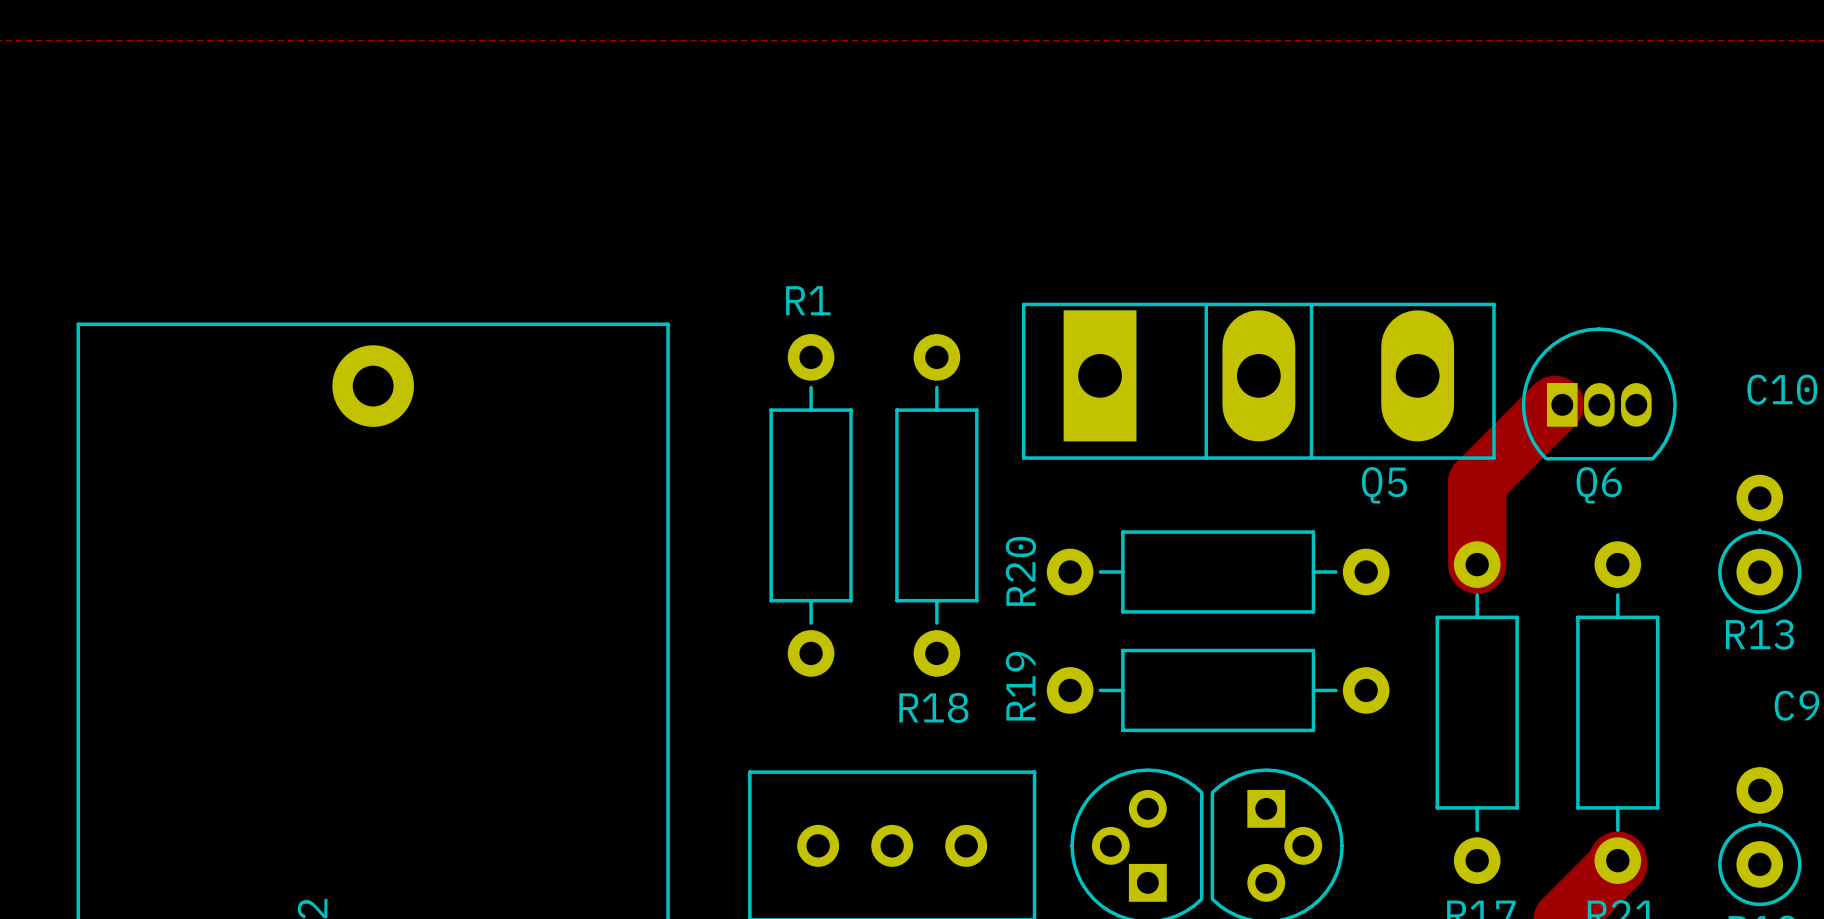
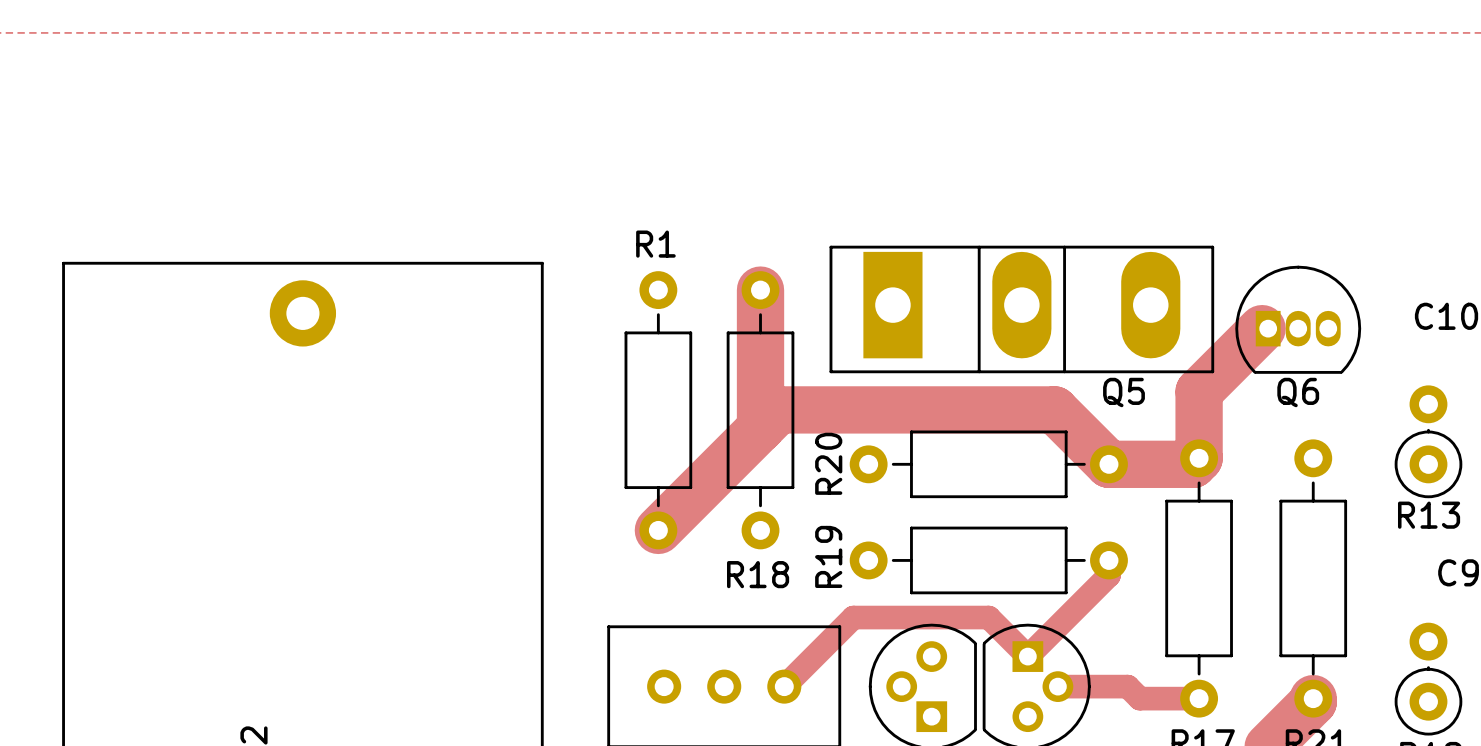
track: none -> (760, 290) (760, 428)
track: none -> (1199, 458) (1193, 464) (1108, 464) (1054, 409) (778, 409) (658, 530)
track: none -> (1108, 560) (1108, 575) (1027, 656) (988, 617) (853, 617) (784, 686)
track: none -> (1066, 686) (1127, 686) (1139, 698) (1199, 698)

